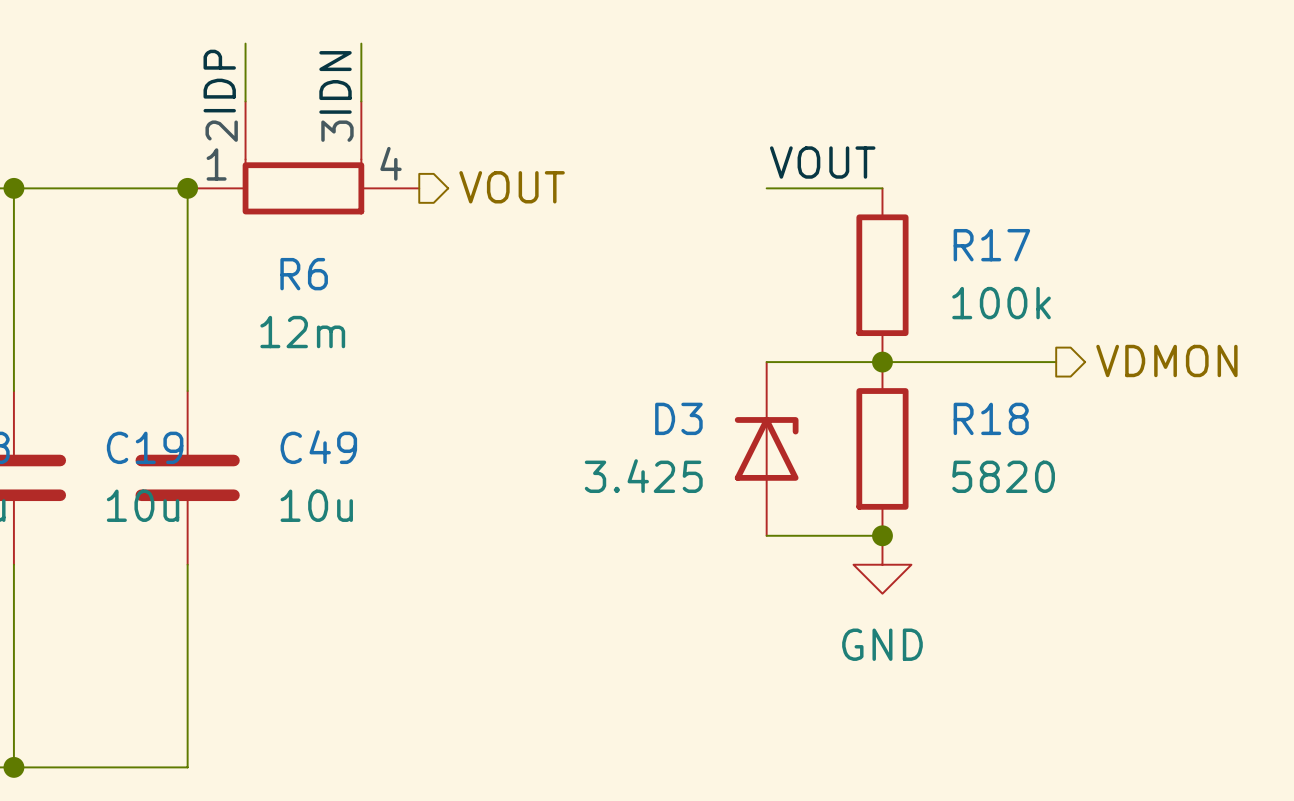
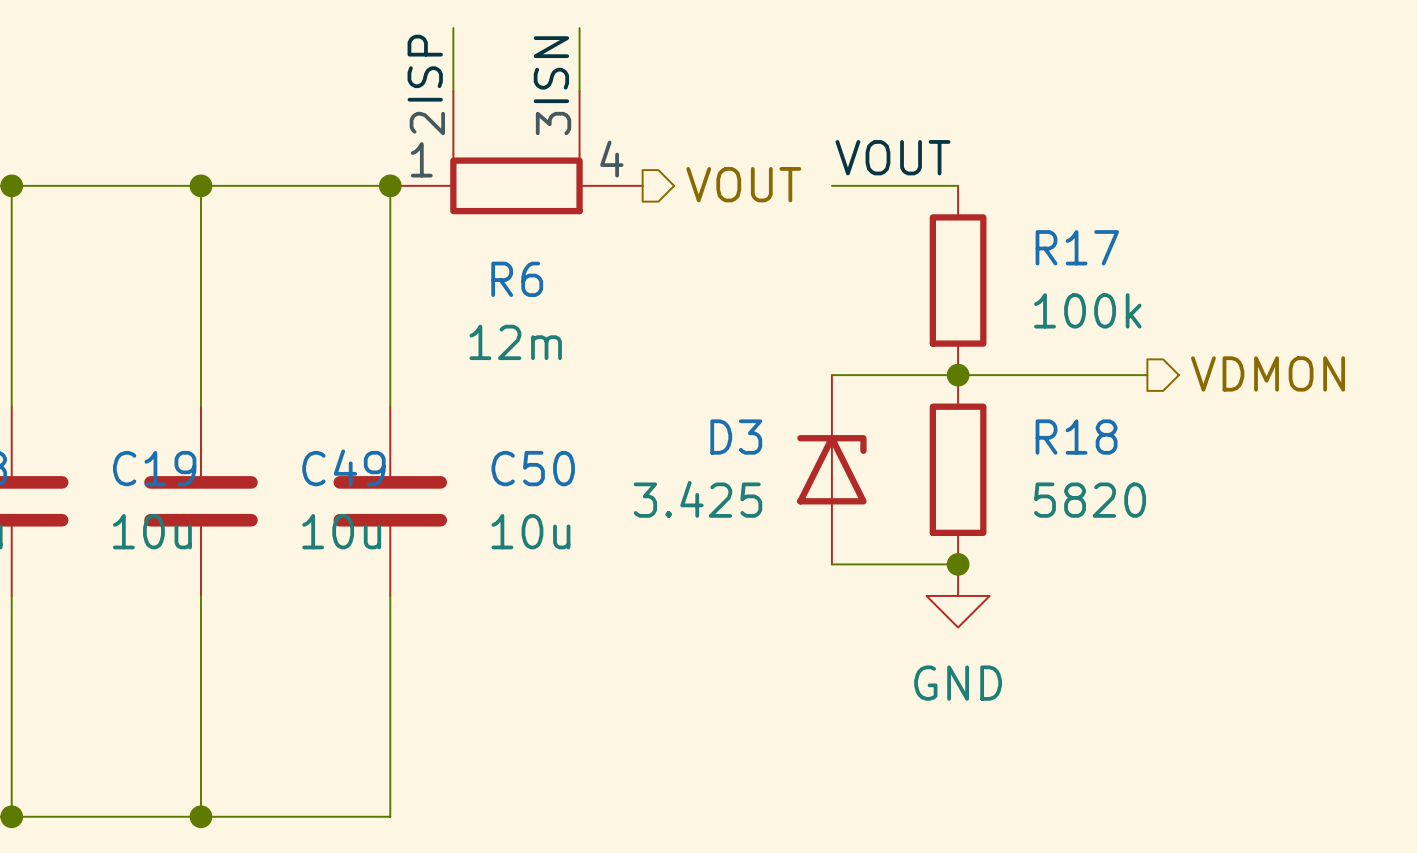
wire: (245, 43) (245, 101) -> (453, 28) (453, 91)
wire: (361, 43) (361, 101) -> (579, 28) (579, 91)
label: none -> ISP (425, 68)
label: IDP (219, 81) -> none
label: none -> ISN (551, 69)
label: IDN (335, 82) -> none
R6 position: (303, 157) -> (516, 152)
hierarchical label position: VOUT (512, 187) -> VOUT (743, 184)
wire: none -> (200, 185) (390, 185) (390, 406)
junction: none -> (390, 185)
C50: none -> 10u (390, 501)
wire: none -> (390, 595) (390, 816) (200, 816)
junction: none -> (200, 816)

